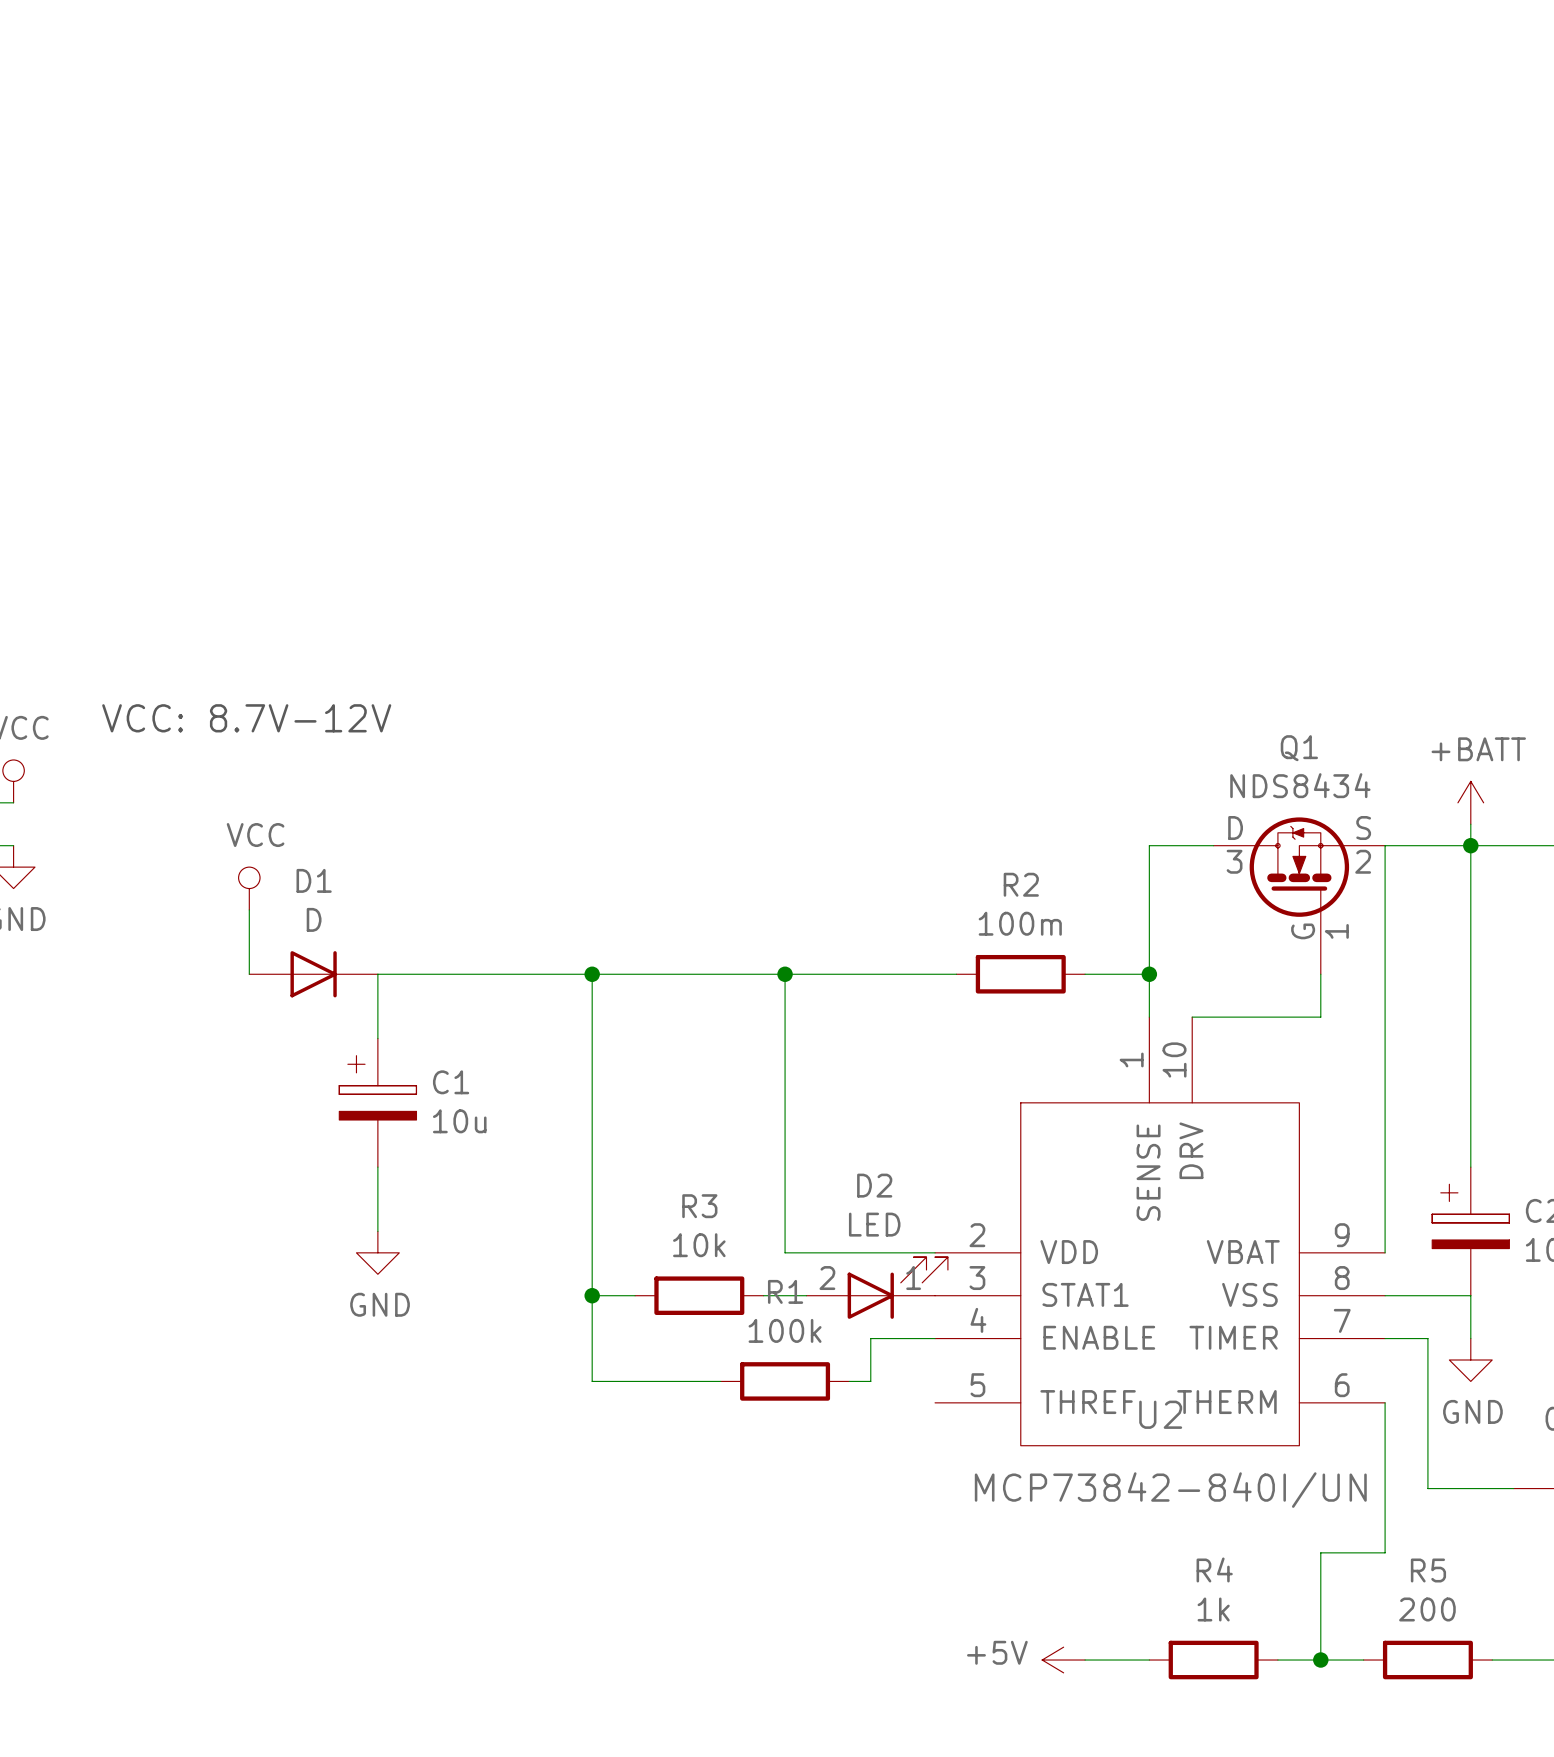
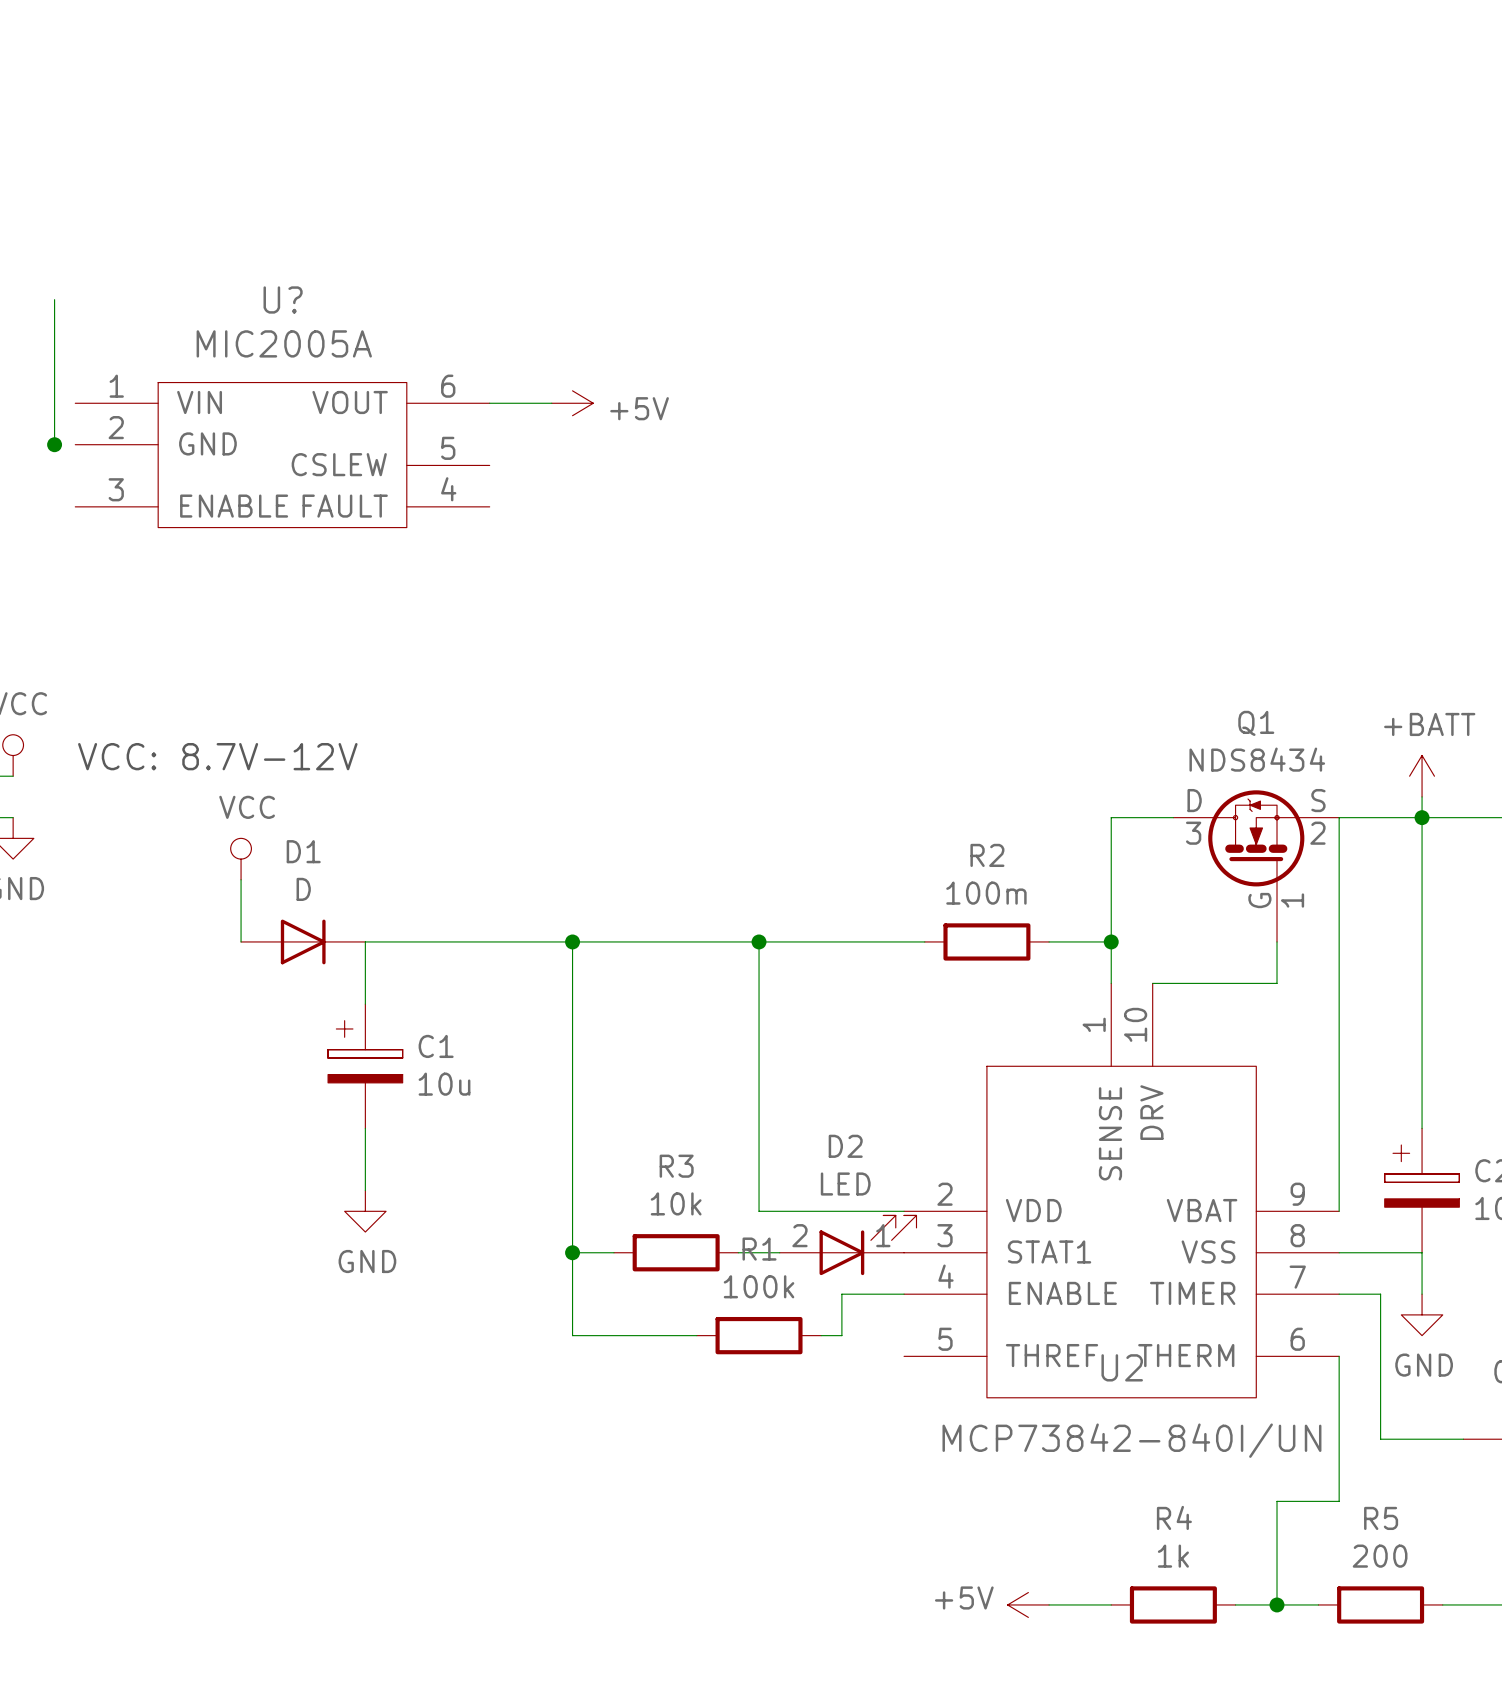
wire: none -> (54, 299) (54, 444)
wire: none -> (489, 403) (551, 403)
power symbol: none -> +5V (572, 403)
junction: none -> (54, 444)
U?: none -> MIC2005A (282, 455)
text position: VCC: 8.7V-12V (246, 718) -> VCC: 8.7V-12V (217, 756)

